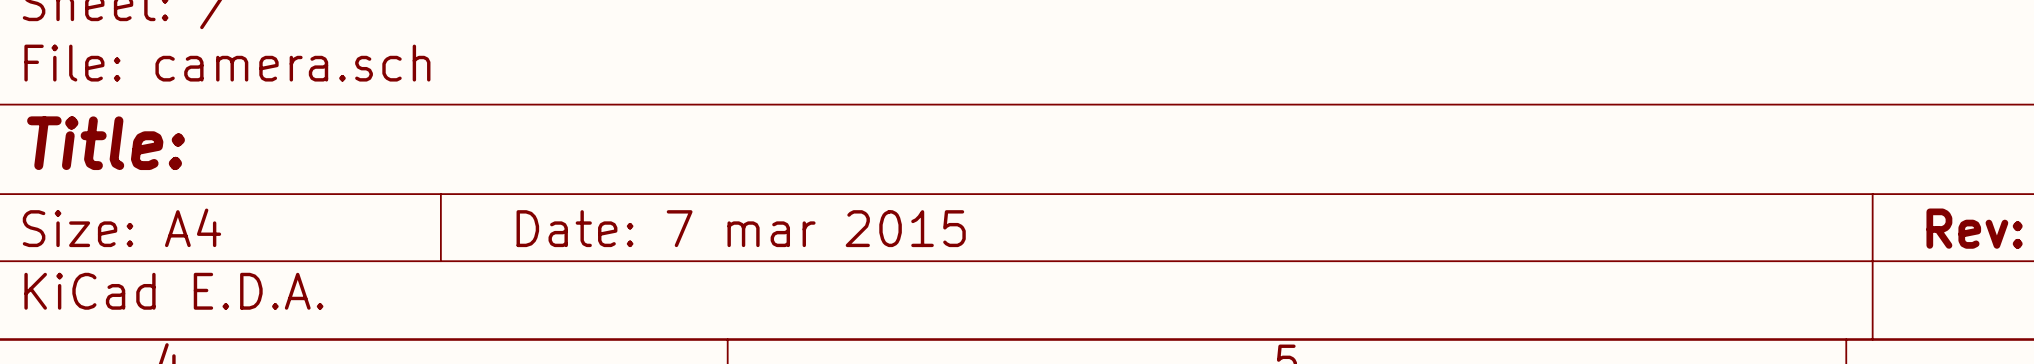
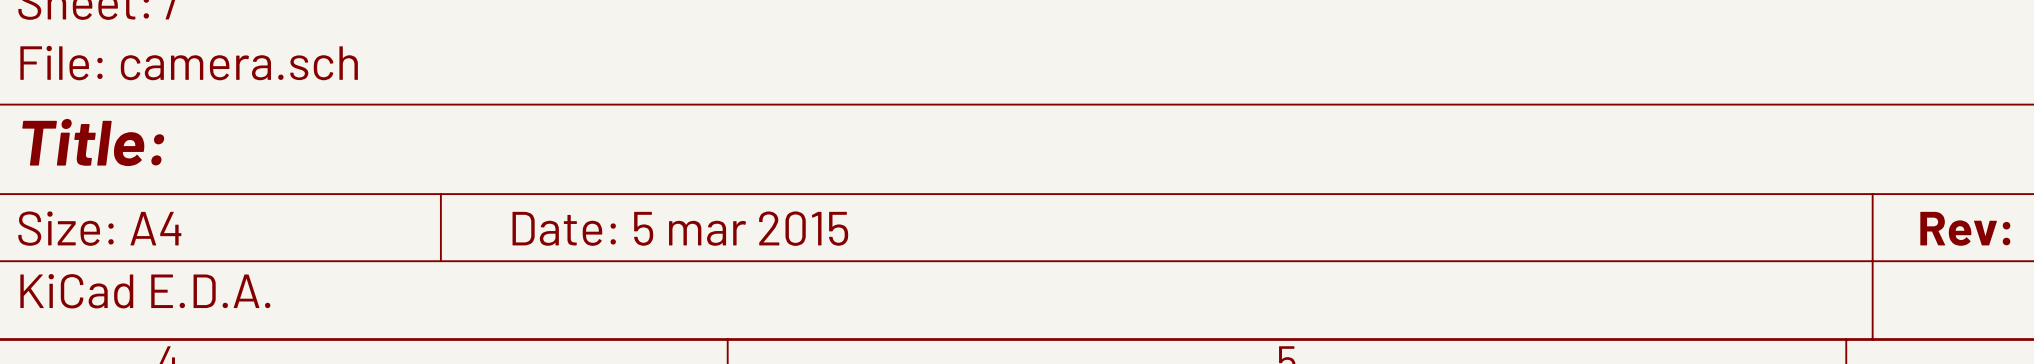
title block: Date: 7 mar 2015 (741, 228) -> Date: 5 mar 2015 (680, 228)

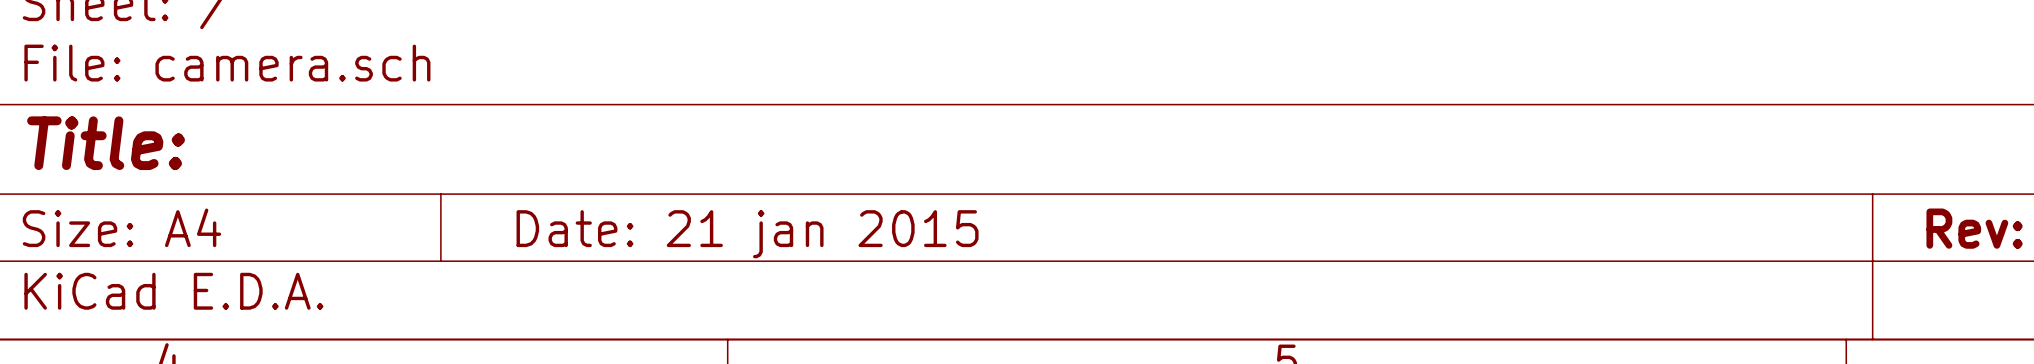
title block: Date: 5 mar 2015 (680, 228) -> Date: 21 jan 2015 (747, 234)

